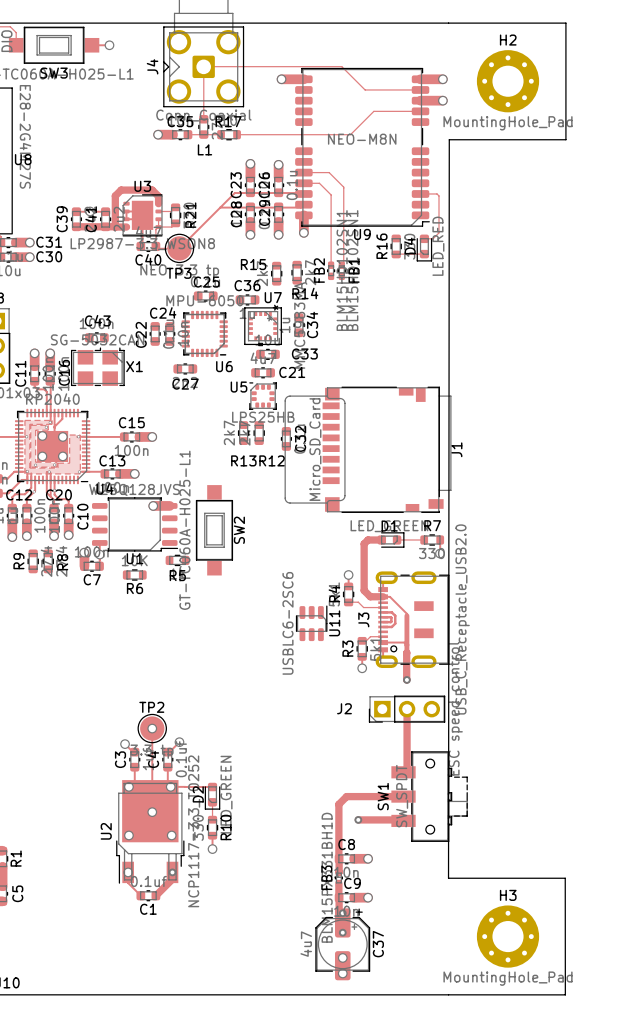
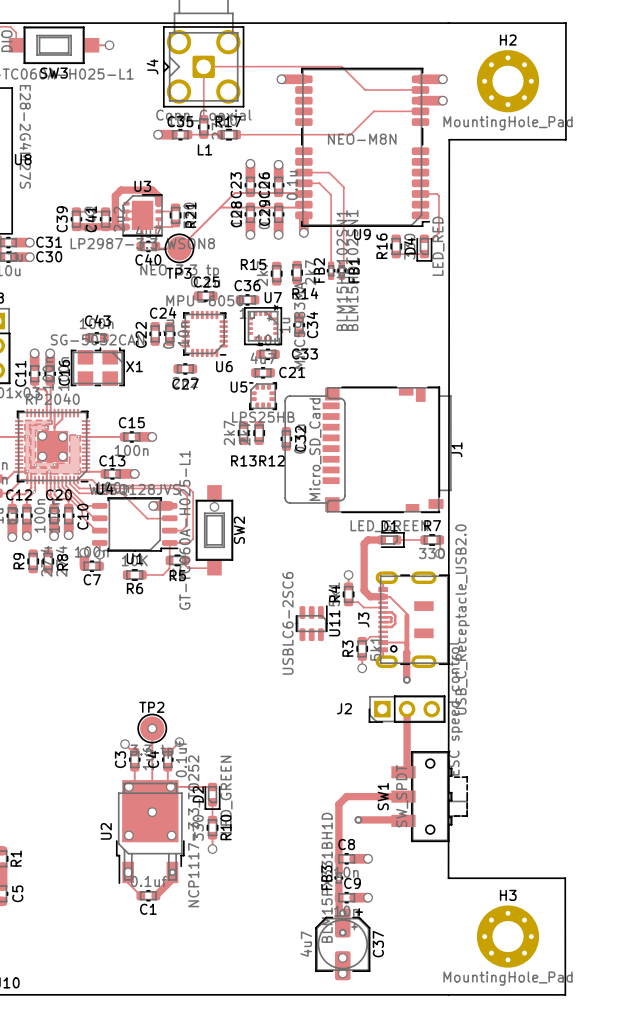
track: none -> (58, 479) (58, 487) (82, 511) (82, 516) (96, 530) (99, 530)
track: none -> (62, 479) (62, 486) (94, 518) (99, 518)
track: none -> (66, 479) (66, 486) (86, 505) (99, 505)
track: none -> (70, 479) (70, 484) (79, 493) (122, 493) (147, 518) (169, 518)
track: none -> (74, 479) (74, 483) (79, 488) (179, 488) (187, 496) (187, 525) (182, 530) (169, 530)
track: none -> (77, 479) (92, 479) (97, 485) (186, 485) (193, 492) (193, 539) (189, 542) (169, 542) (169, 568) (162, 574) (142, 574)
via: none -> (214, 506)
track: none -> (185, 560) (185, 565) (188, 568) (214, 568)

